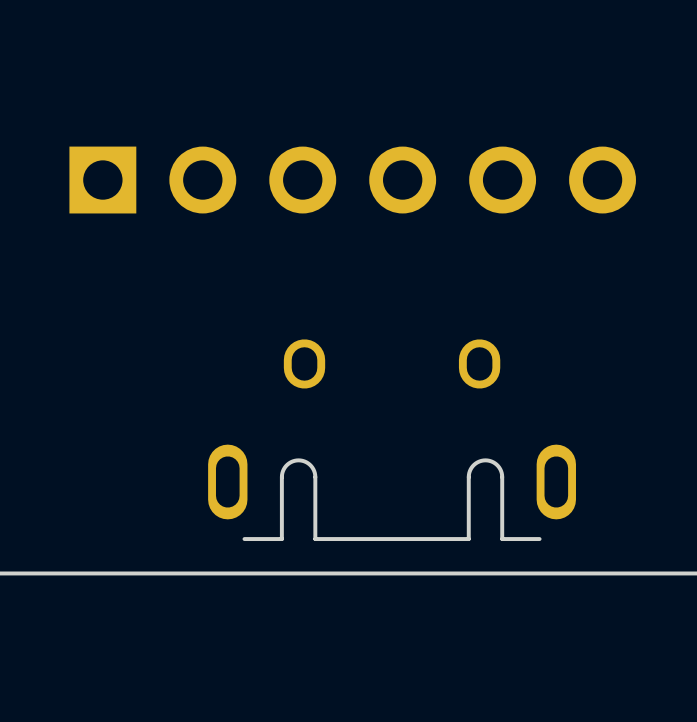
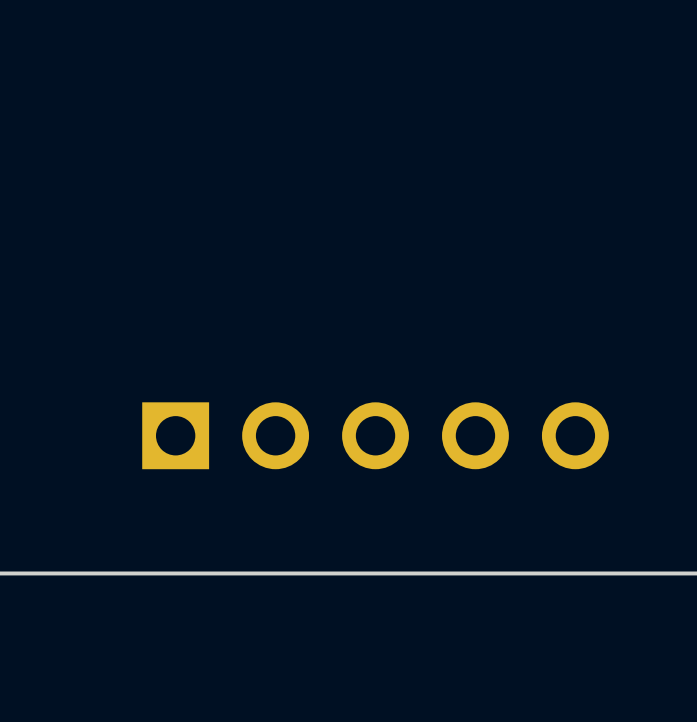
part: (352, 180) -> none
part footprint: [208, 339, 576, 542] -> [142, 402, 609, 470]

